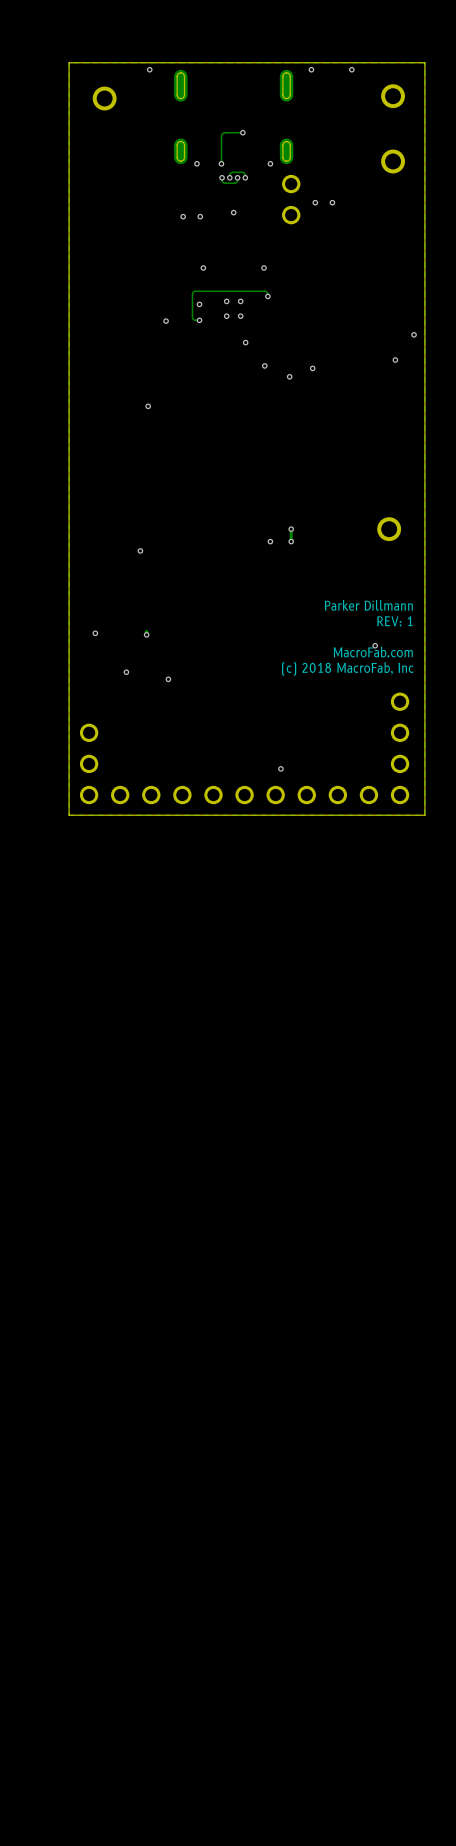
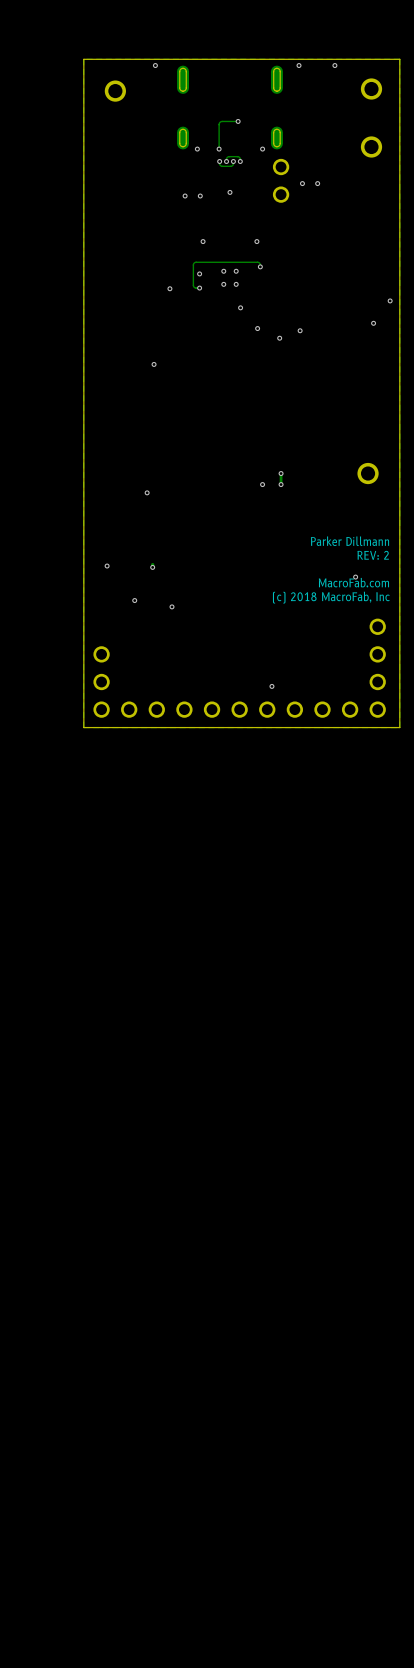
drawing shape: [282, 600, 414, 676] -> [272, 536, 390, 604]

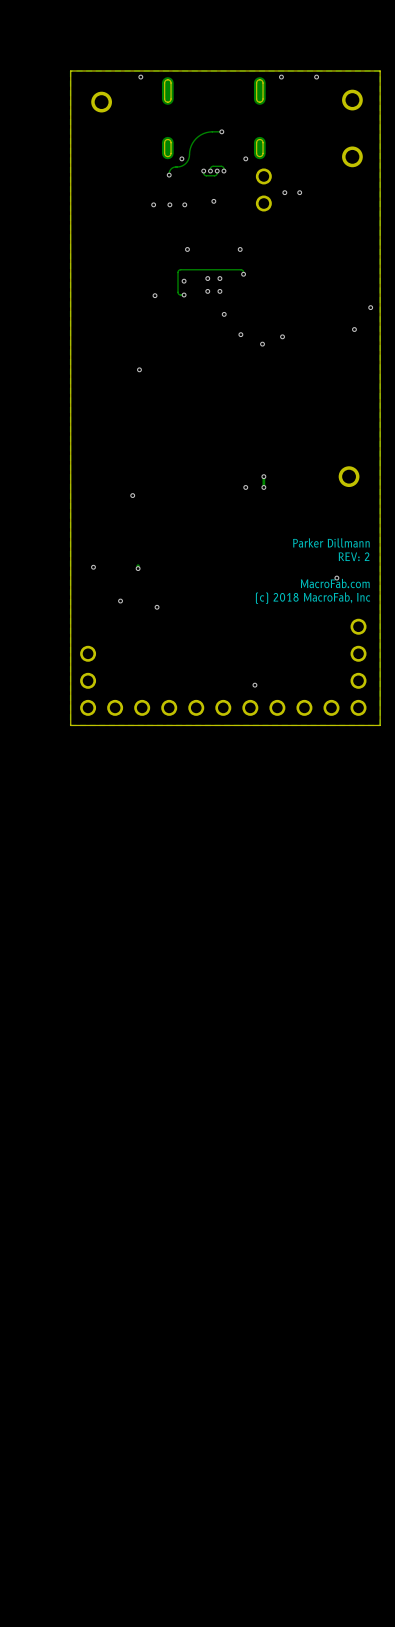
track: (228, 121) (219, 123) (219, 149) -> (212, 131) (203, 133) (196, 138) (191, 145) (186, 162) (181, 166) (171, 168) (169, 175)
via: (219, 149) -> none
via: none -> (169, 175)
via: none -> (153, 204)

